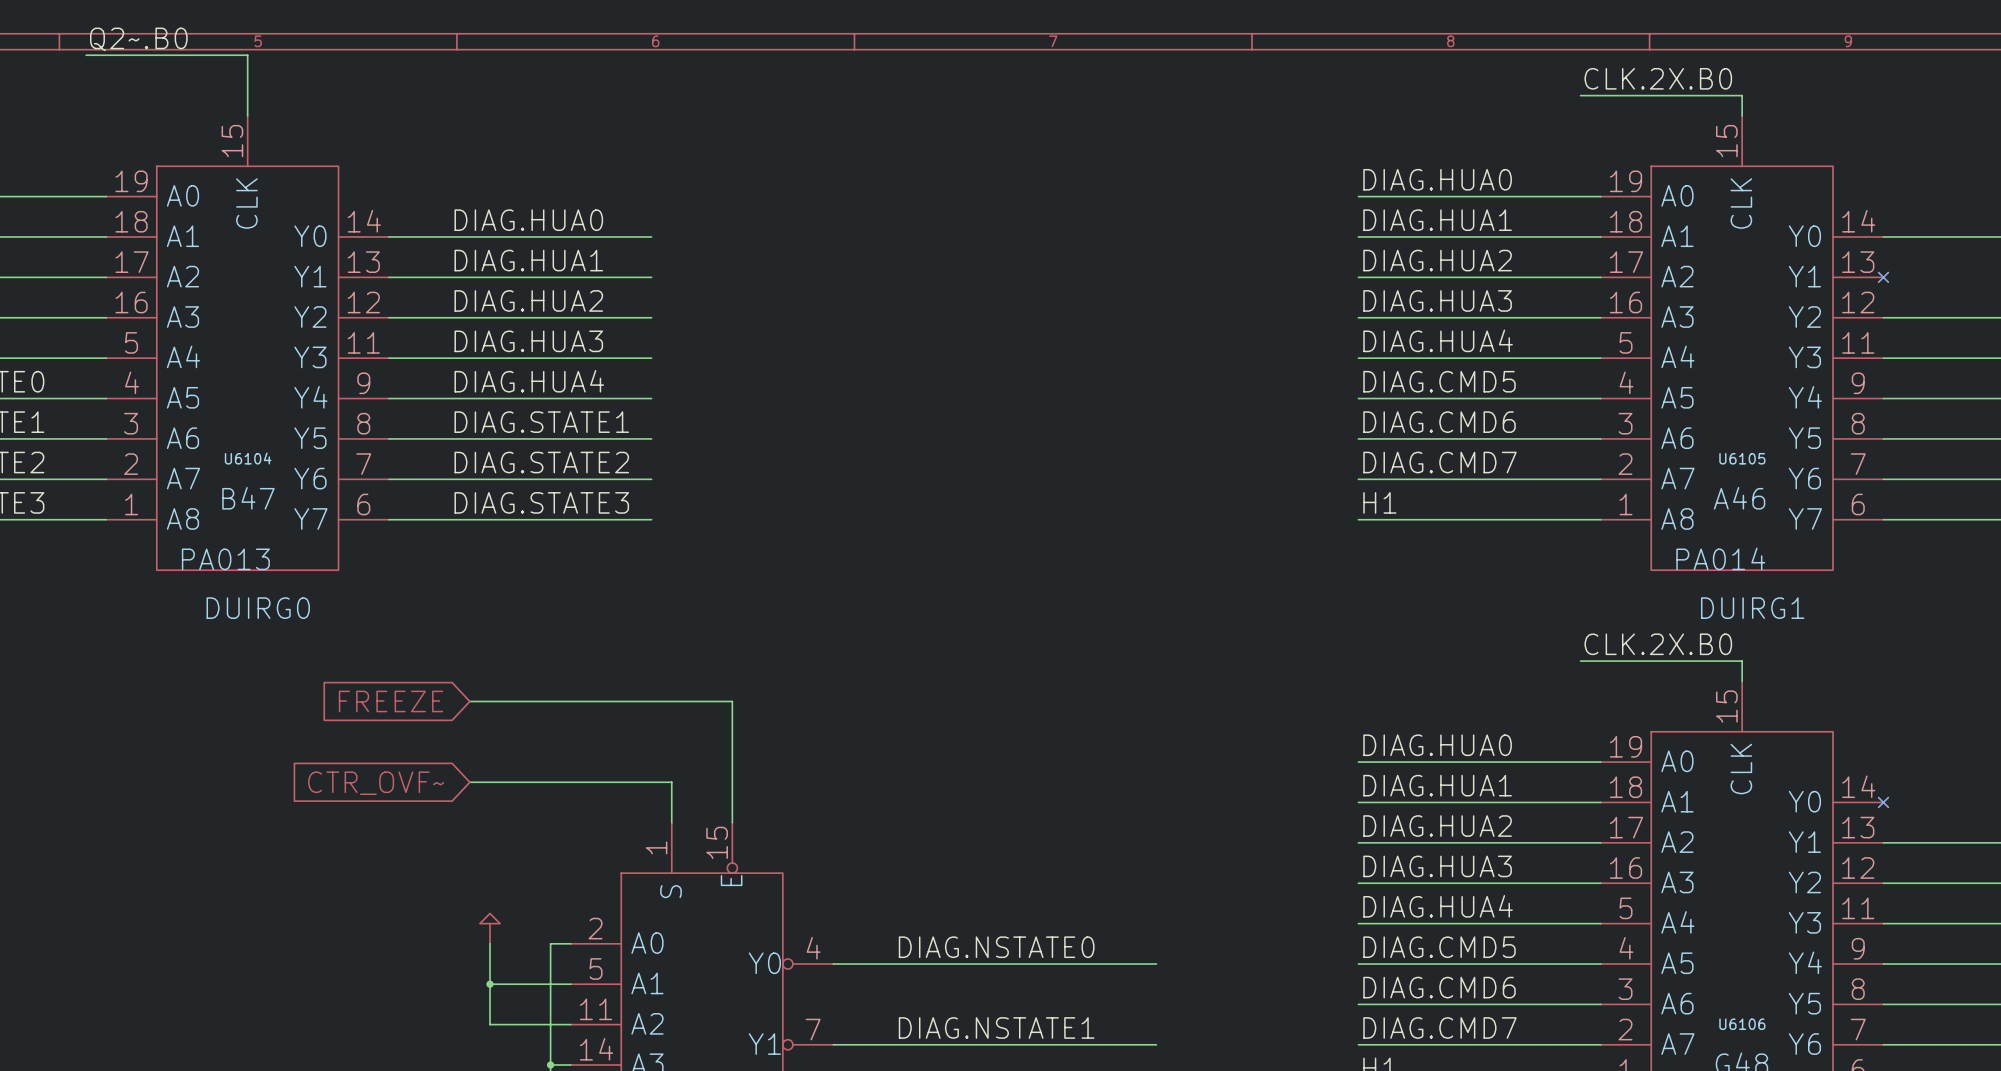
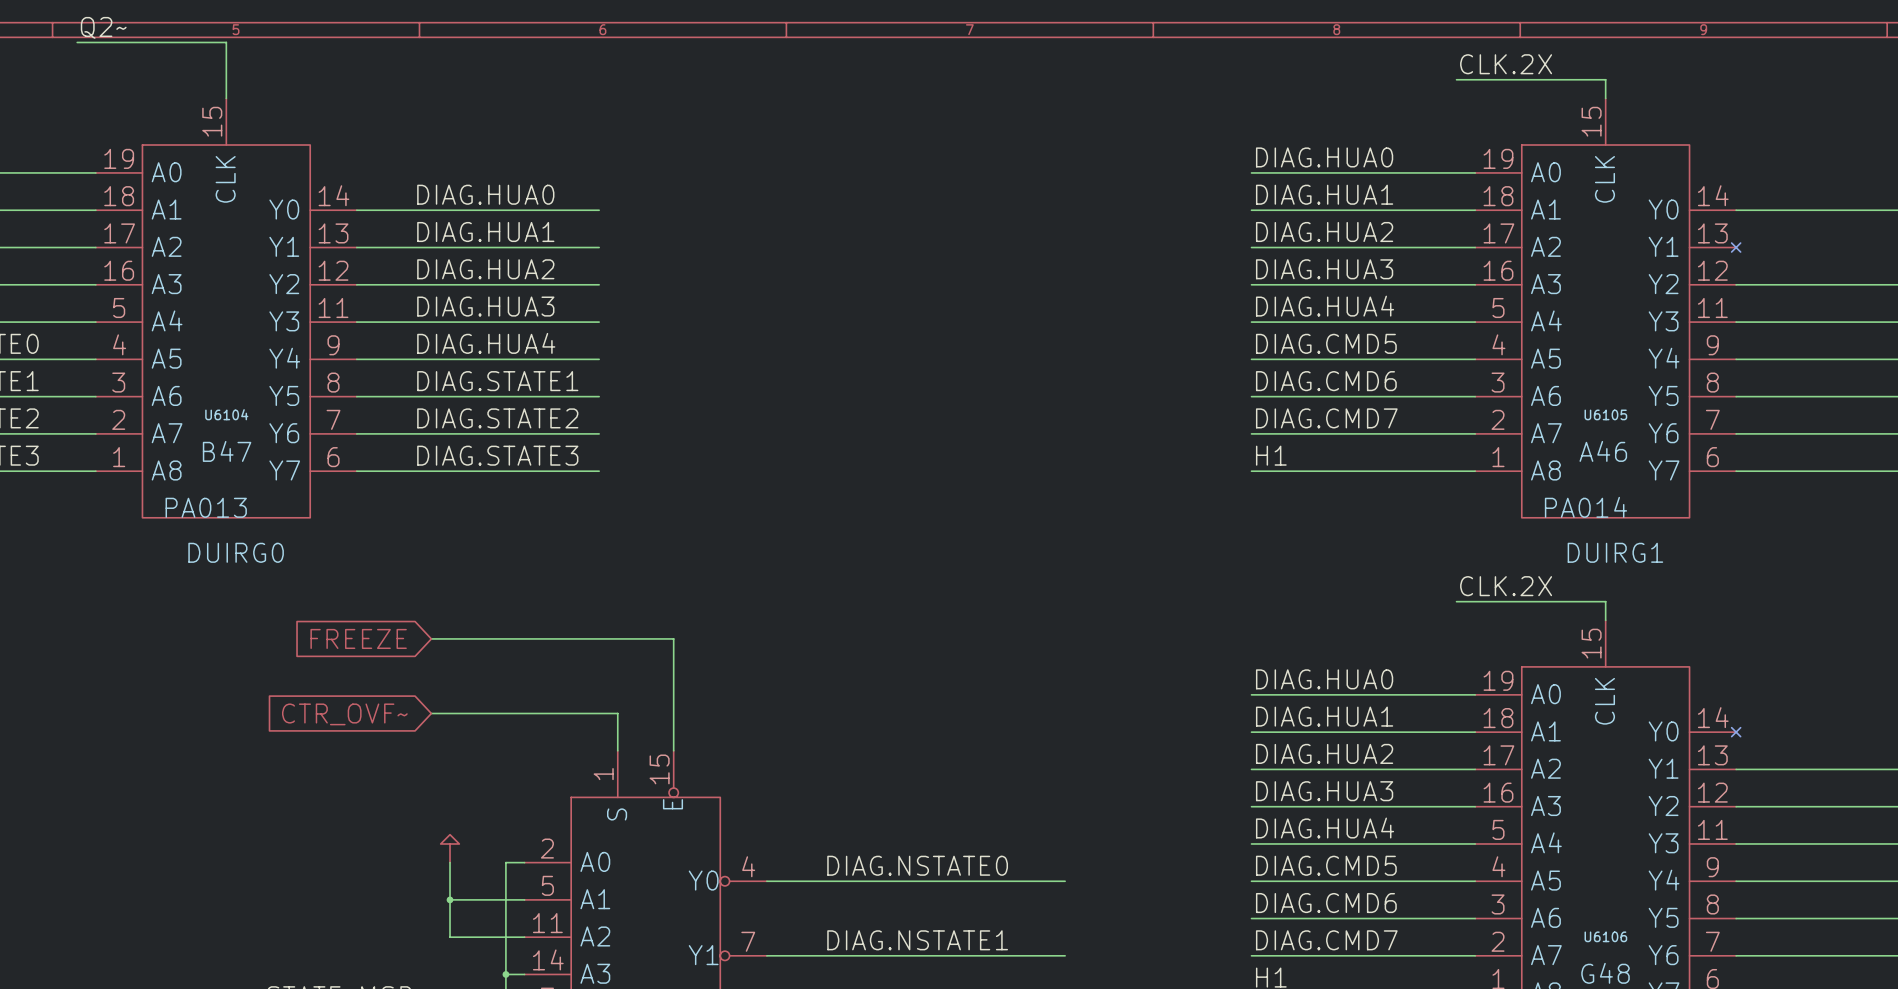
label: Q2~.B0 (138, 39) -> Q2~ (103, 27)
label: CLK.2X.B0 (1658, 78) -> CLK.2X (1506, 64)
label: CLK.2X.B0 (1658, 644) -> CLK.2X (1506, 586)

